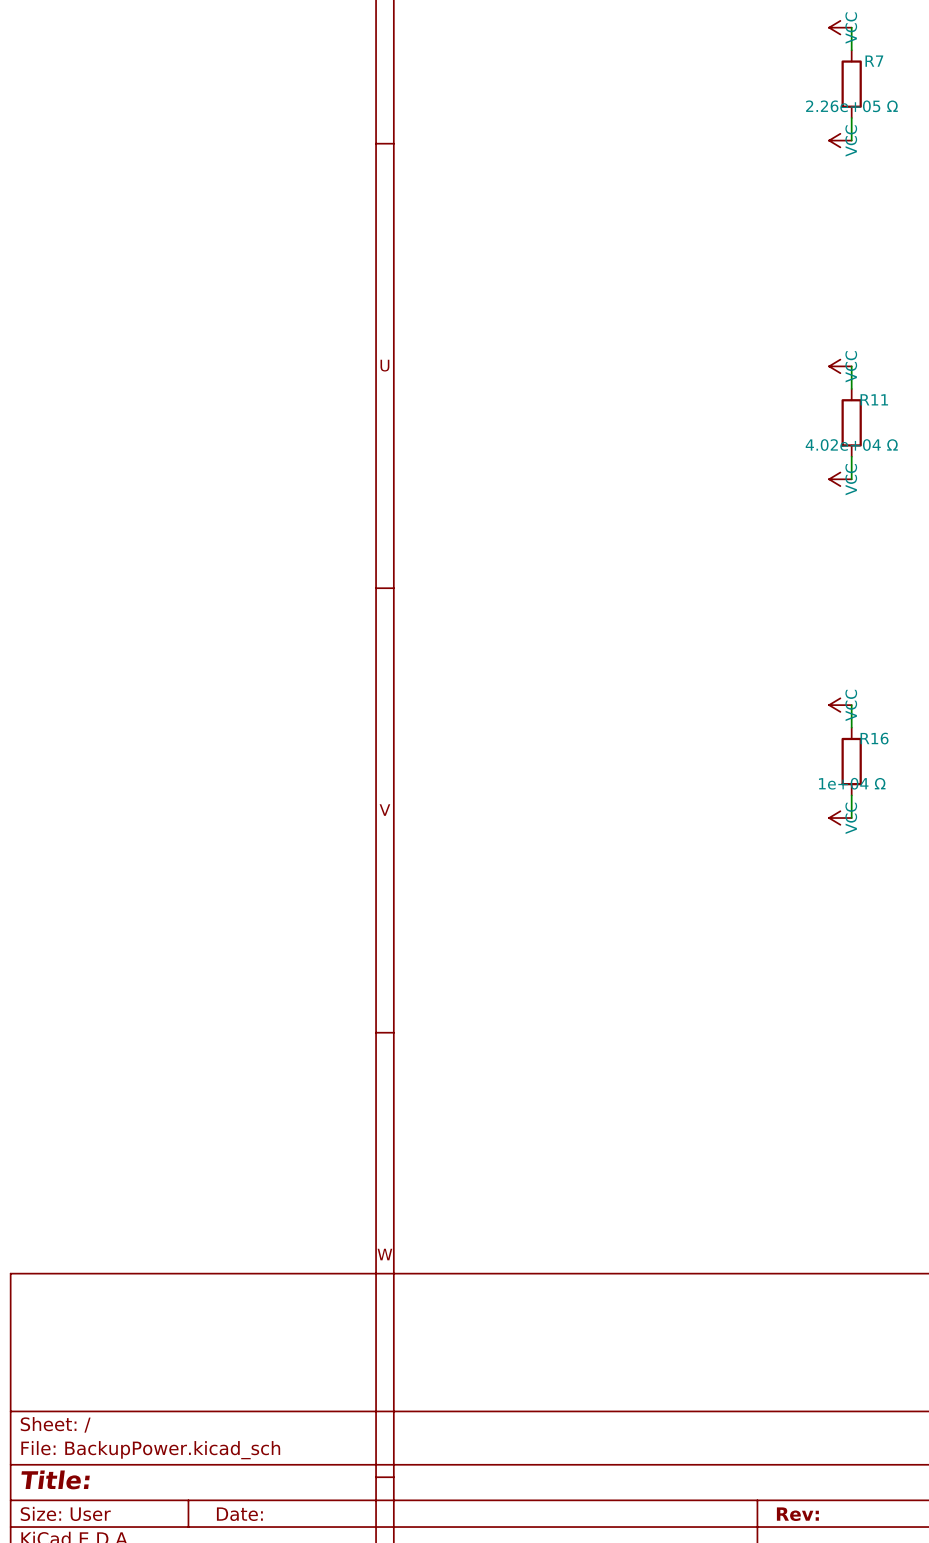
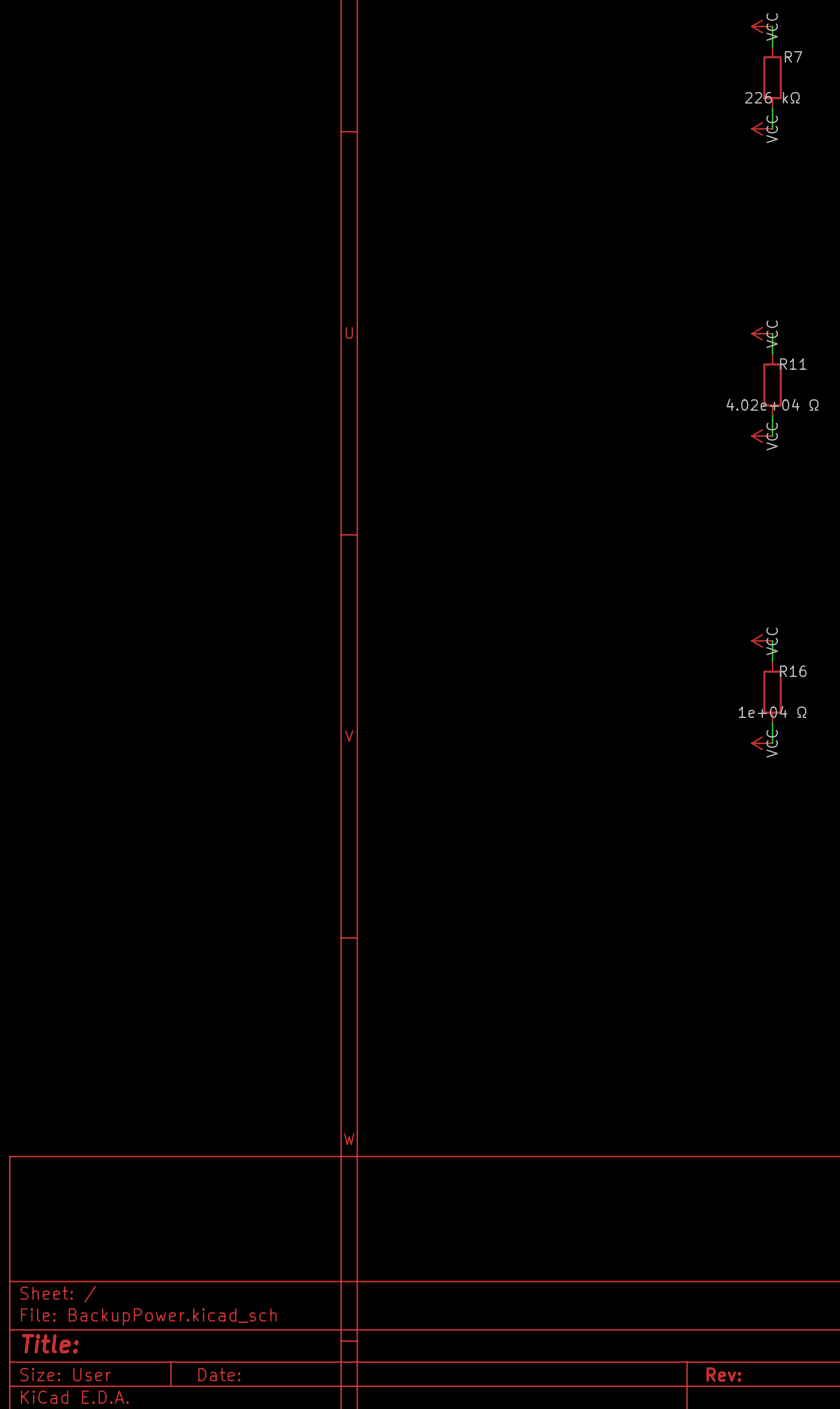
R7 value: 2.26e+05 Ω (851, 106) -> 226 kΩ (772, 97)

